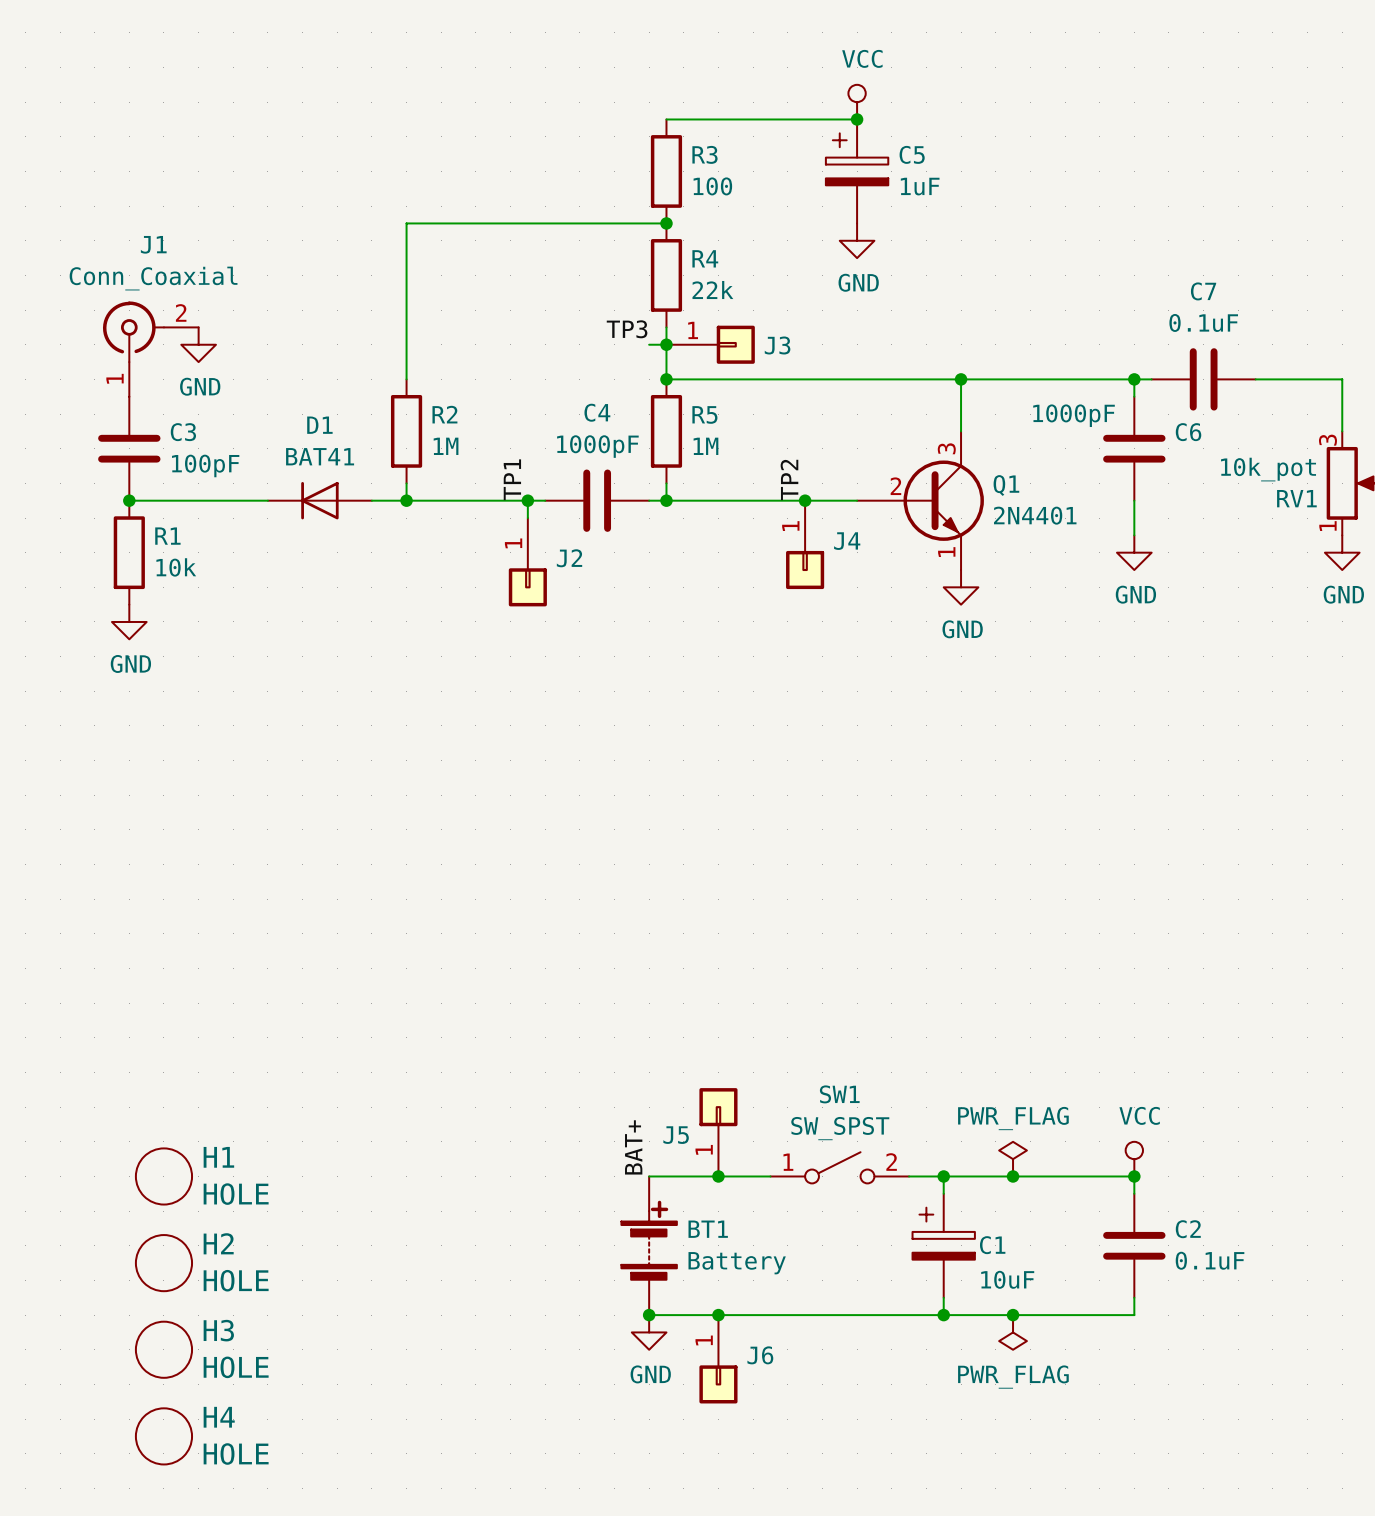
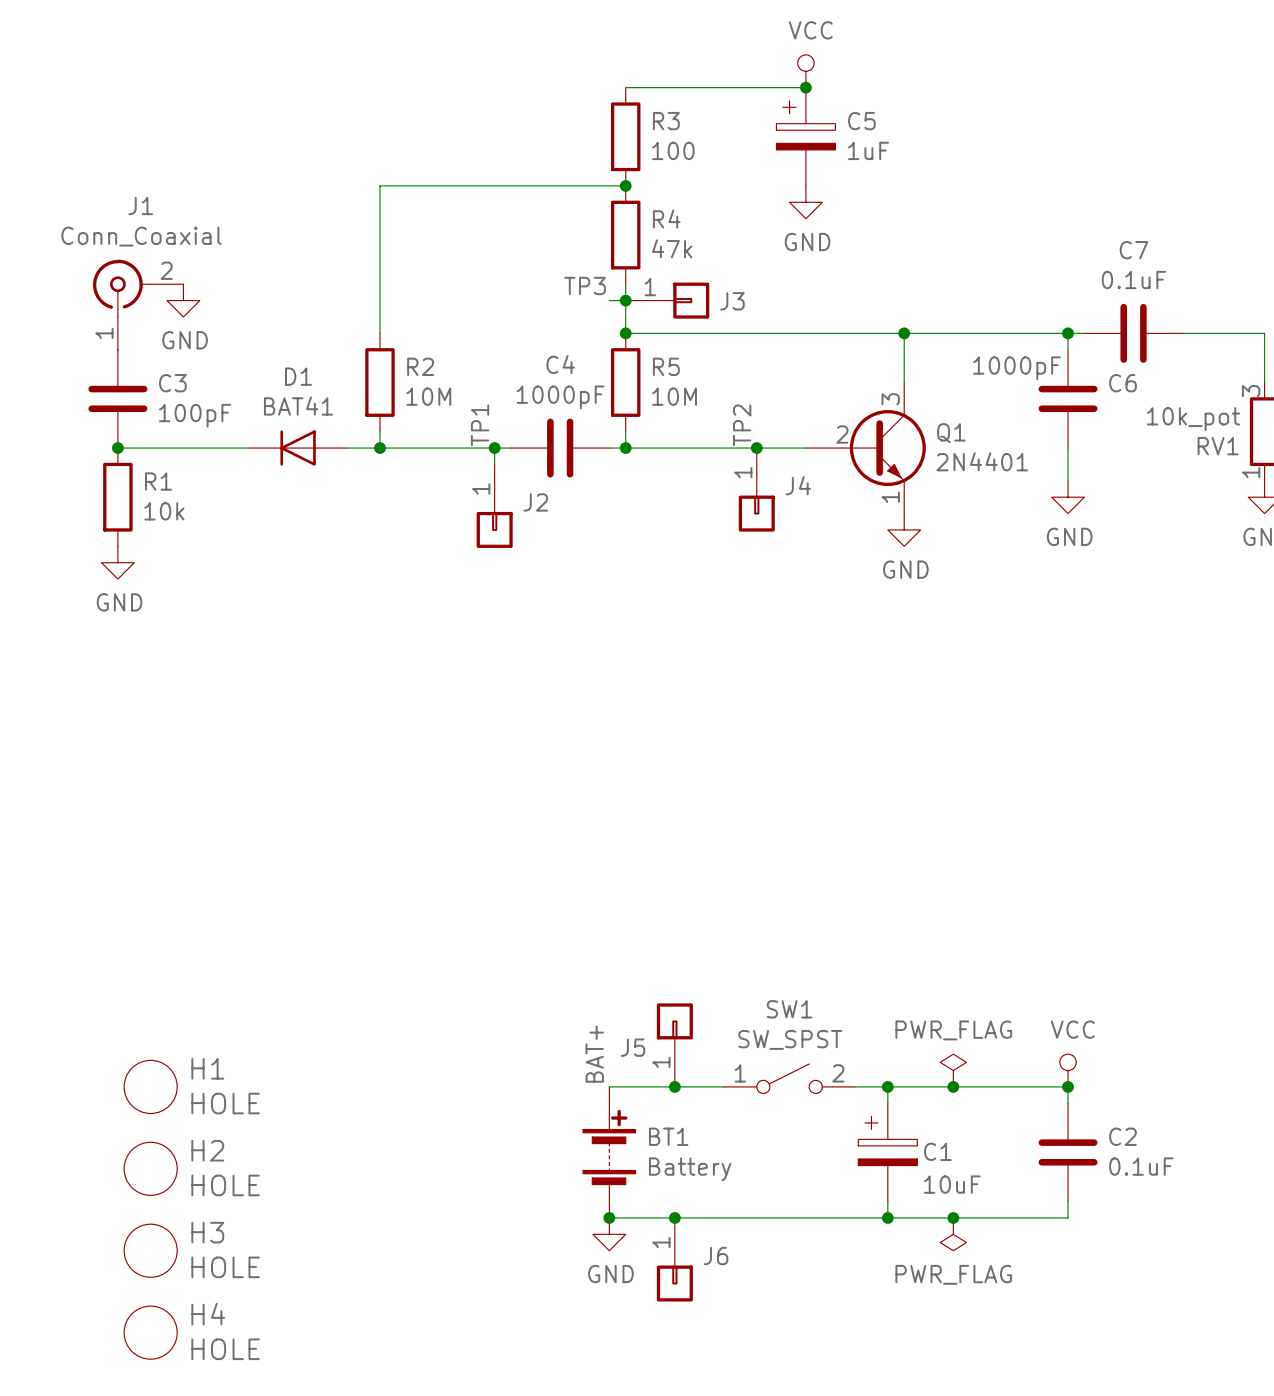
R4 value: 22k (712, 290) -> 47k (672, 248)
R2 value: 1M (446, 446) -> 10M (428, 396)
R5 value: 1M (705, 446) -> 10M (674, 396)

